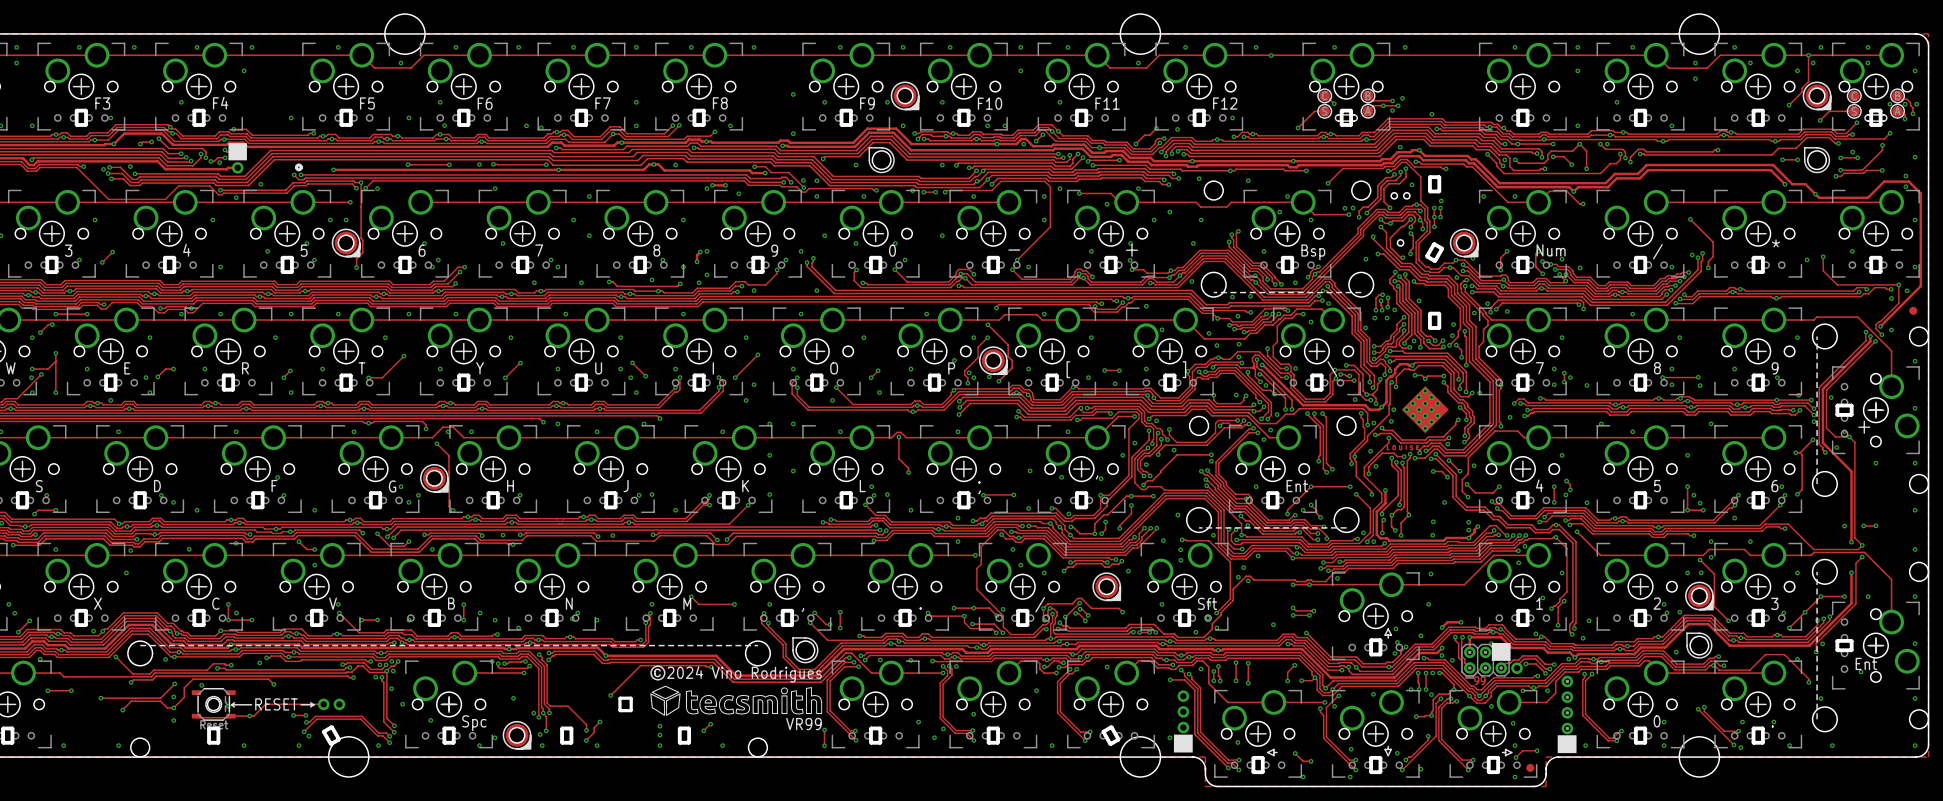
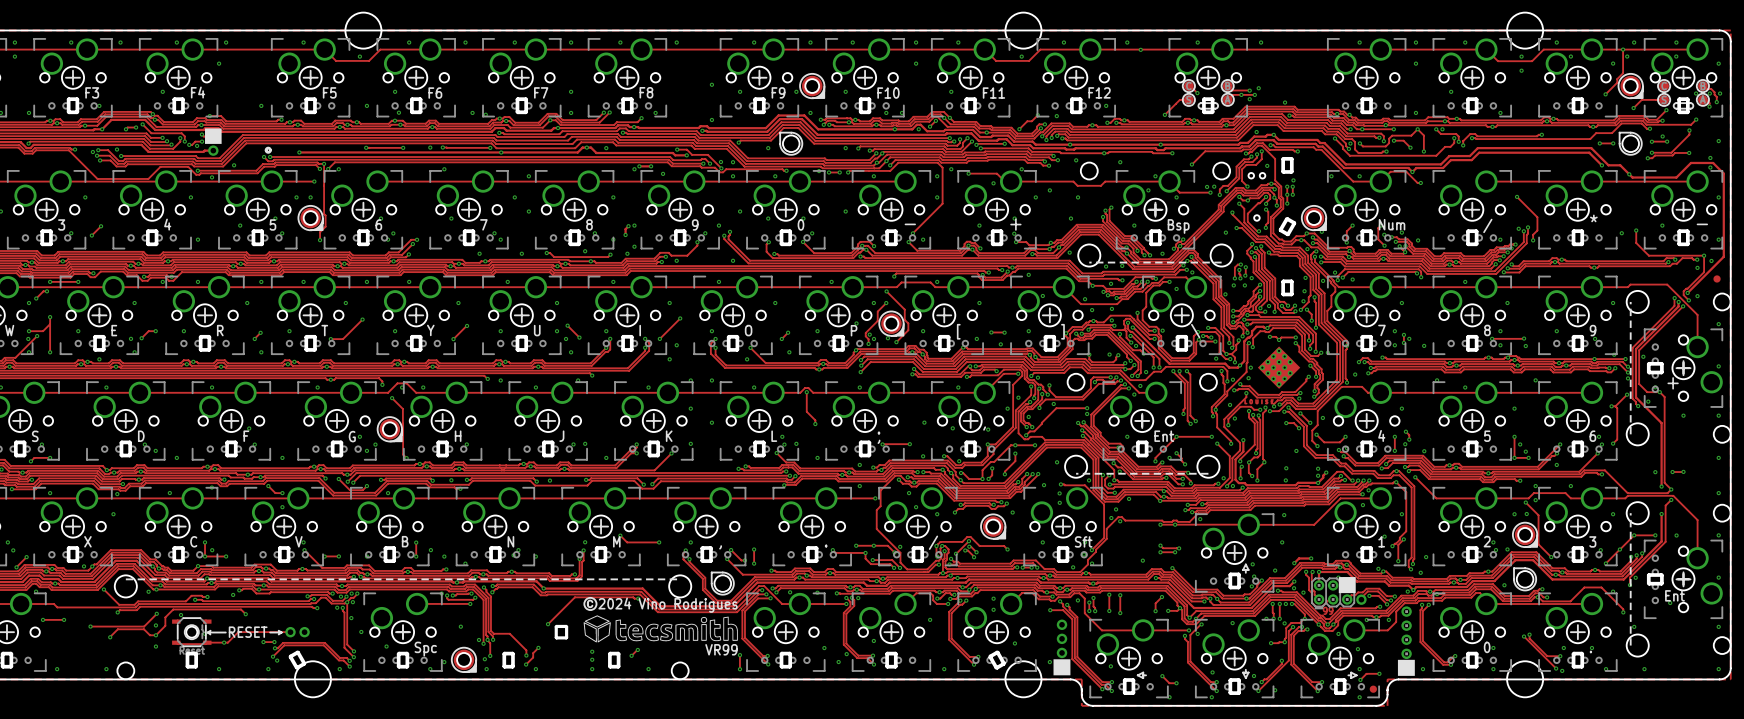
via position: (1419, 300) -> (1305, 277)
via: none -> (993, 609)
via: none -> (1014, 643)

